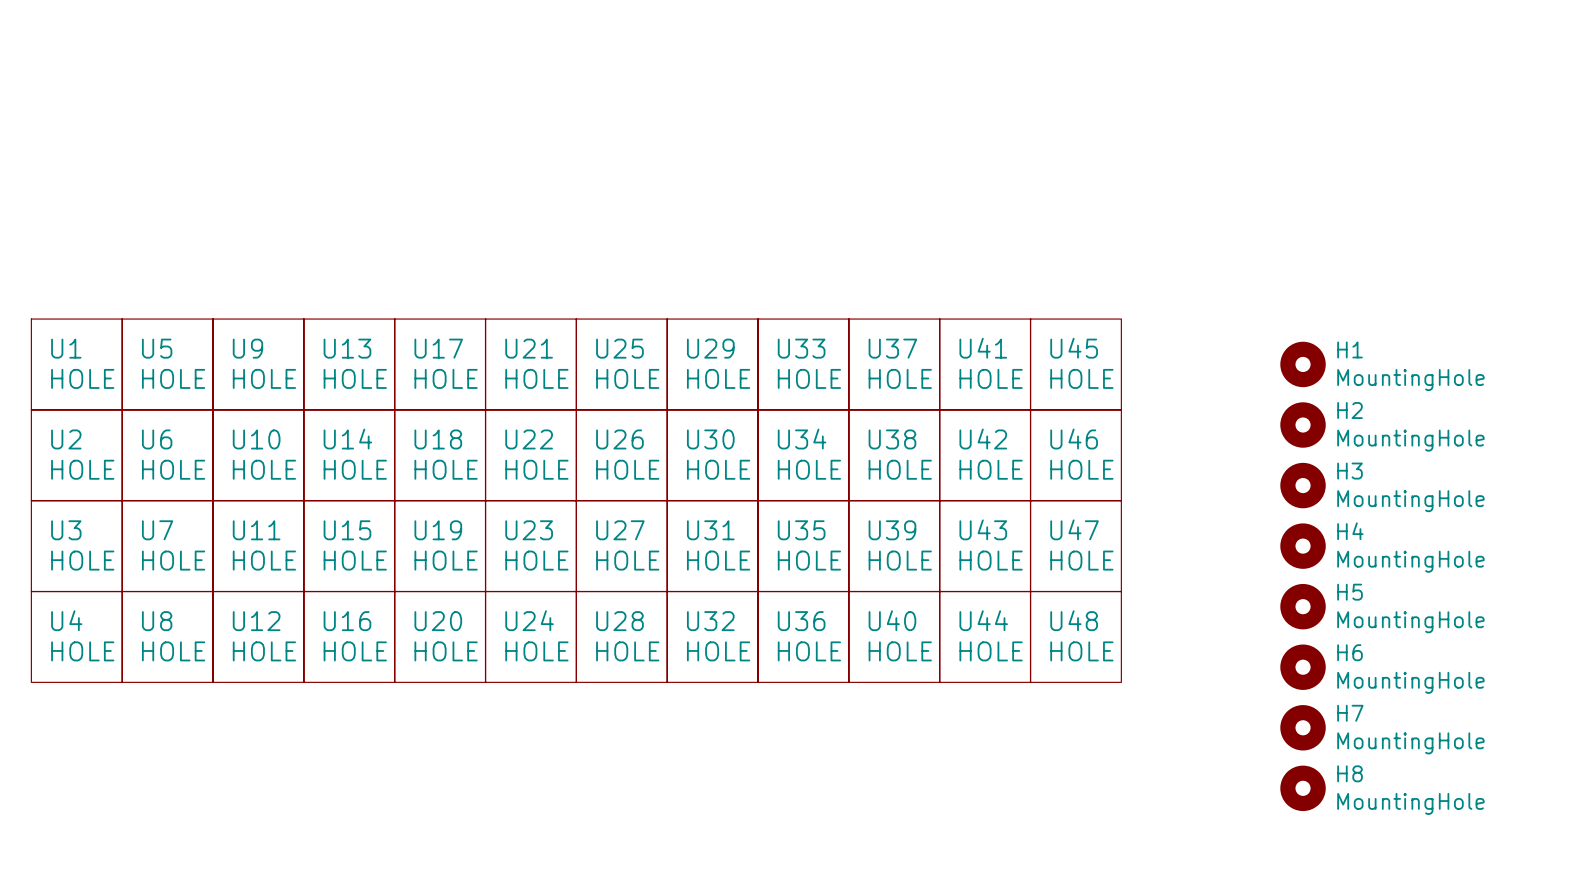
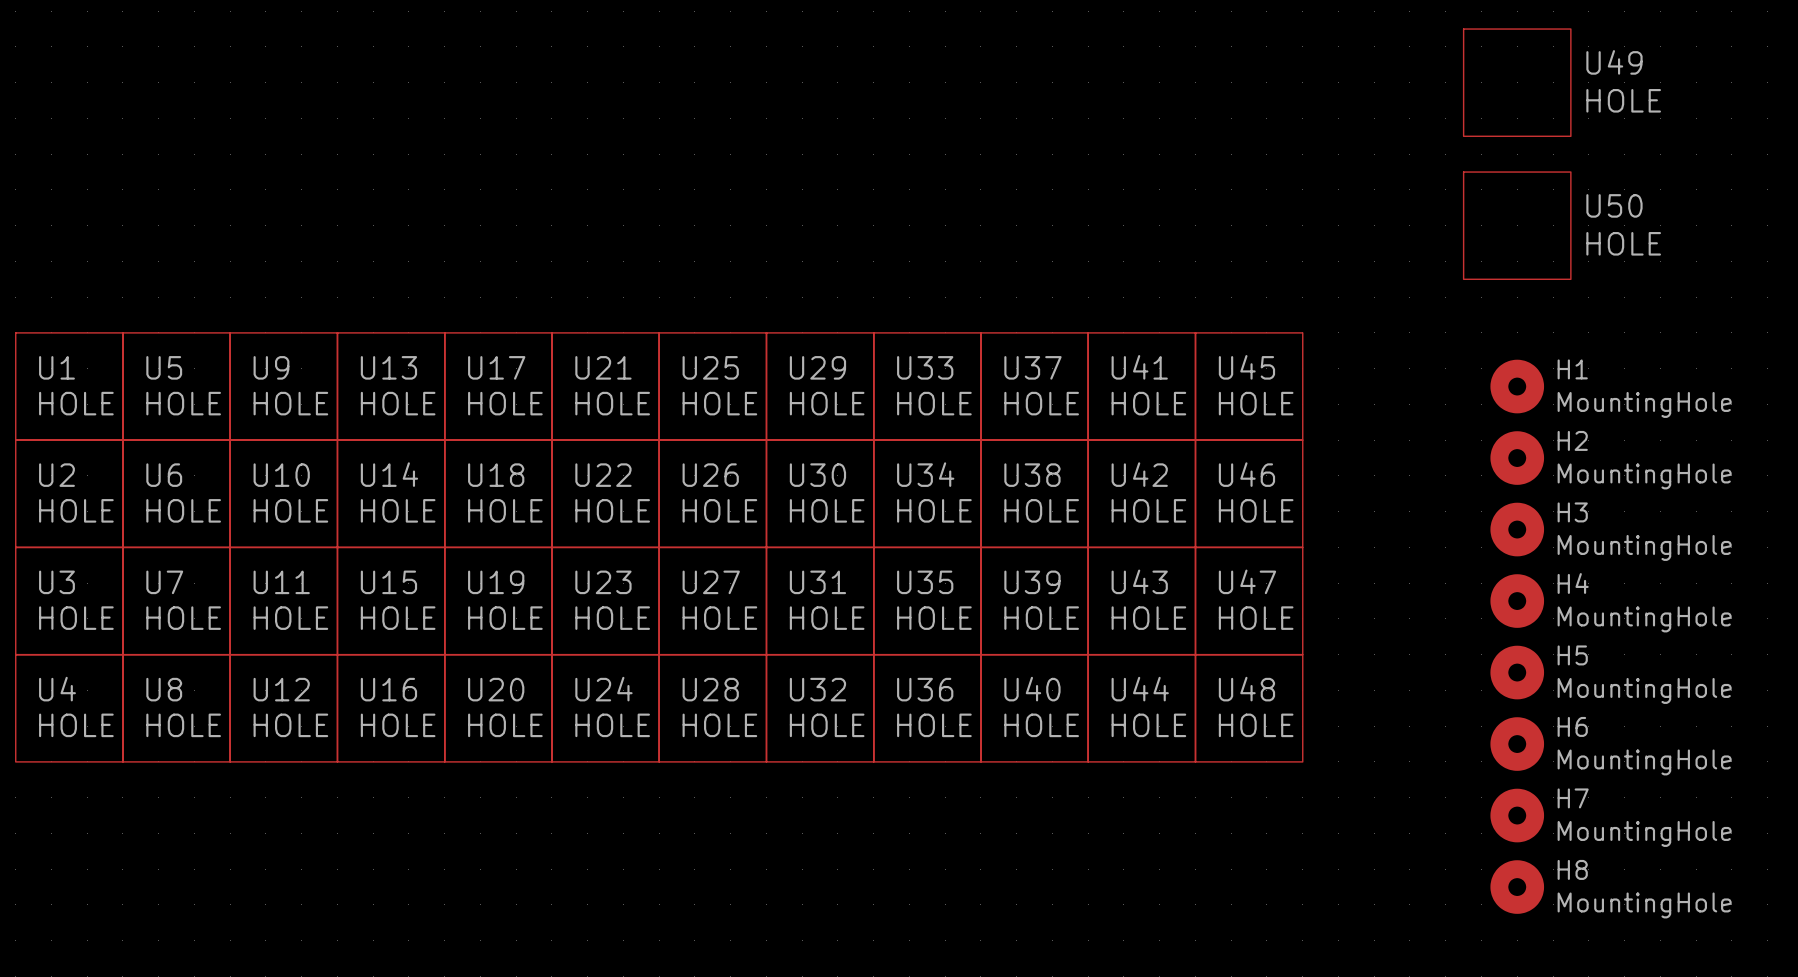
U49: none -> HOLE (1517, 82)
U50: none -> HOLE (1517, 225)

